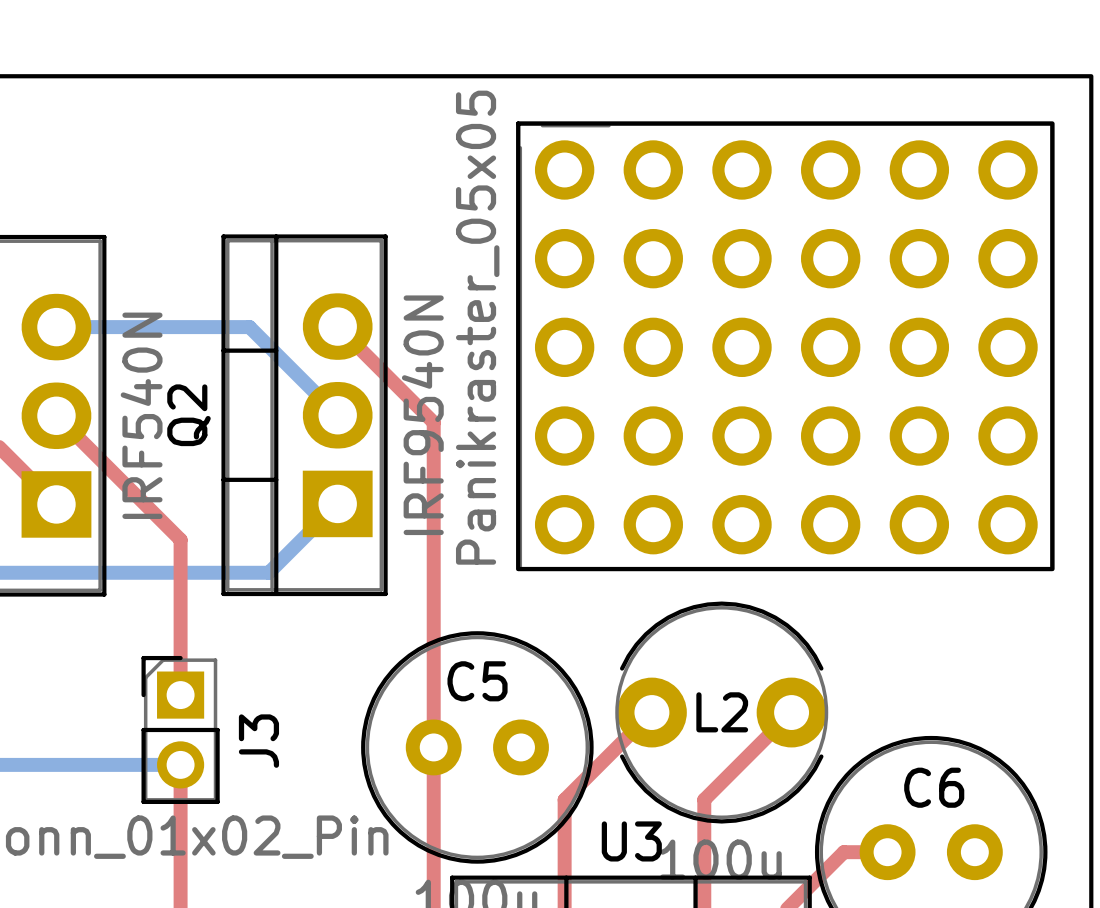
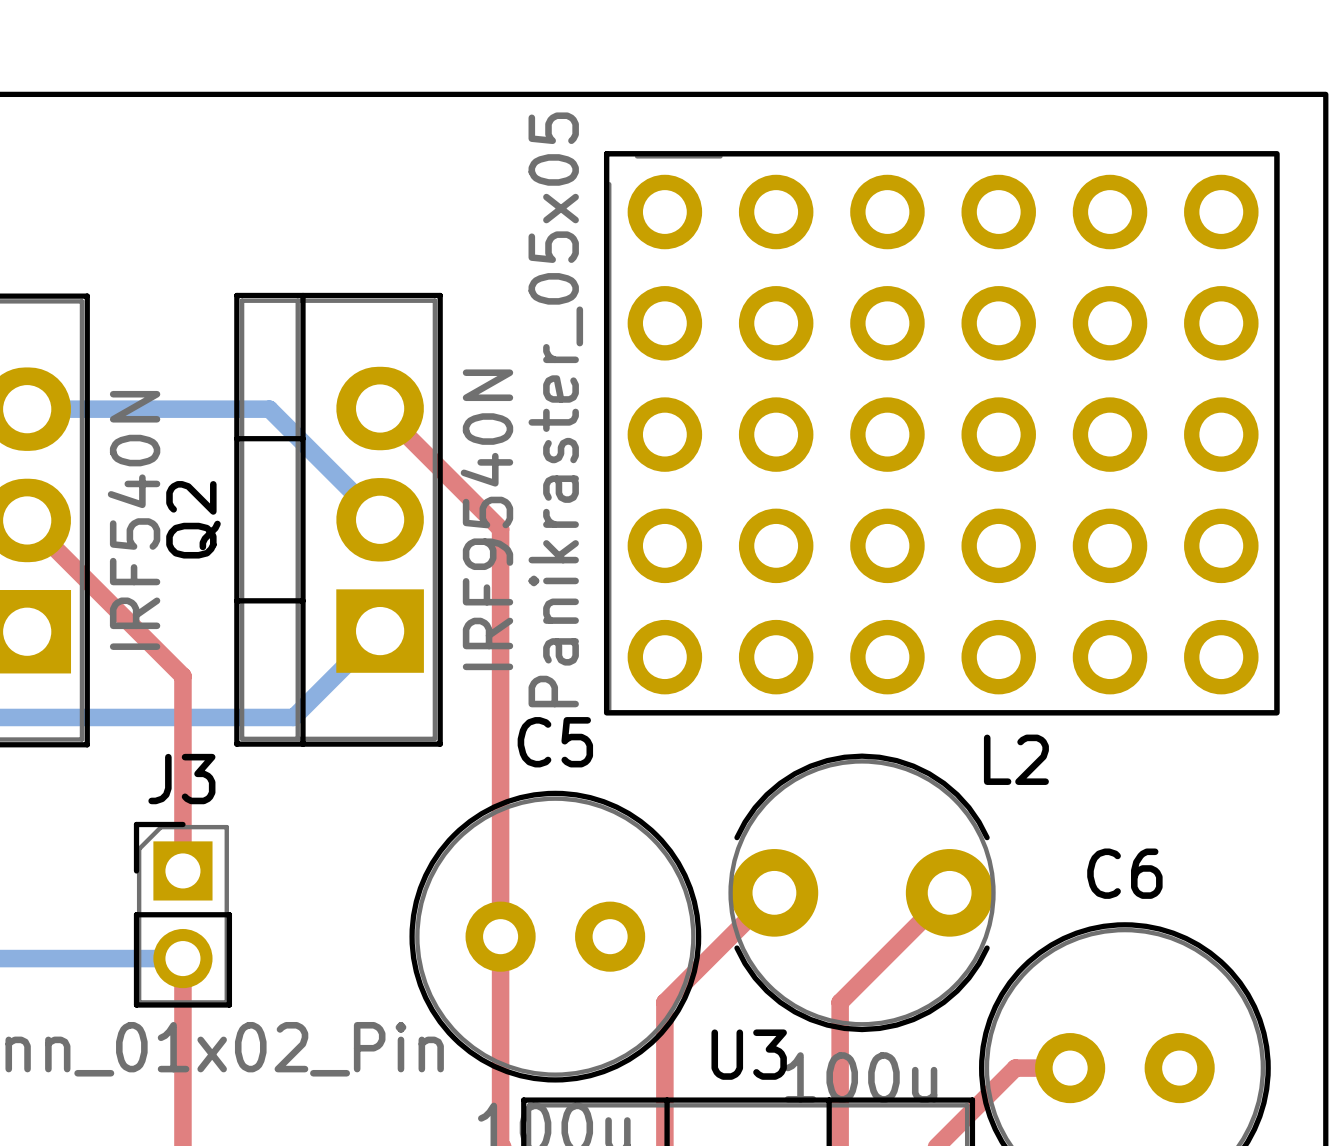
C5 name position: C5 (477, 681) -> C5 (555, 742)
L2 name position: L2 (722, 712) -> L2 (1016, 759)
J3 name rotation: 0° (258, 741) -> 90° clockwise (181, 779)
J3 name position: J3 (258, 741) -> J3 (181, 779)
C6 name position: C6 (934, 787) -> C6 (1124, 873)

